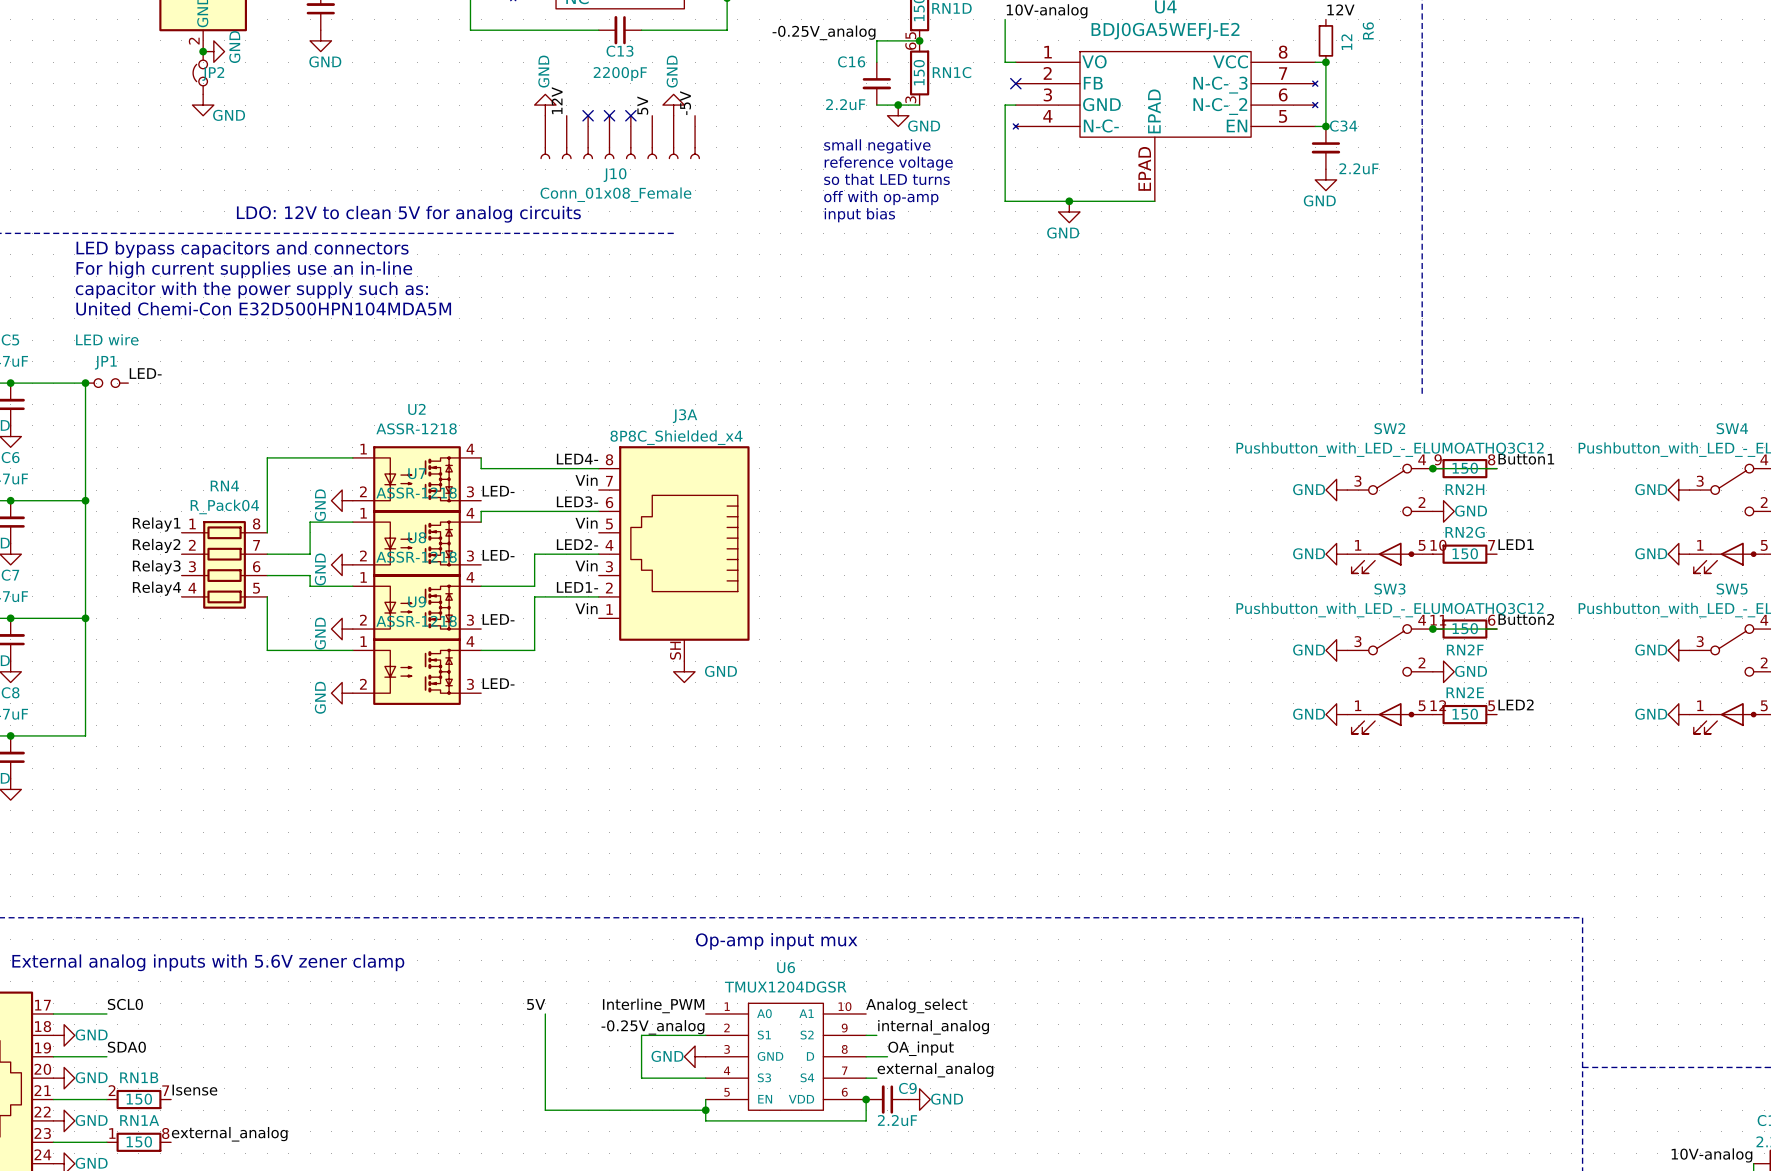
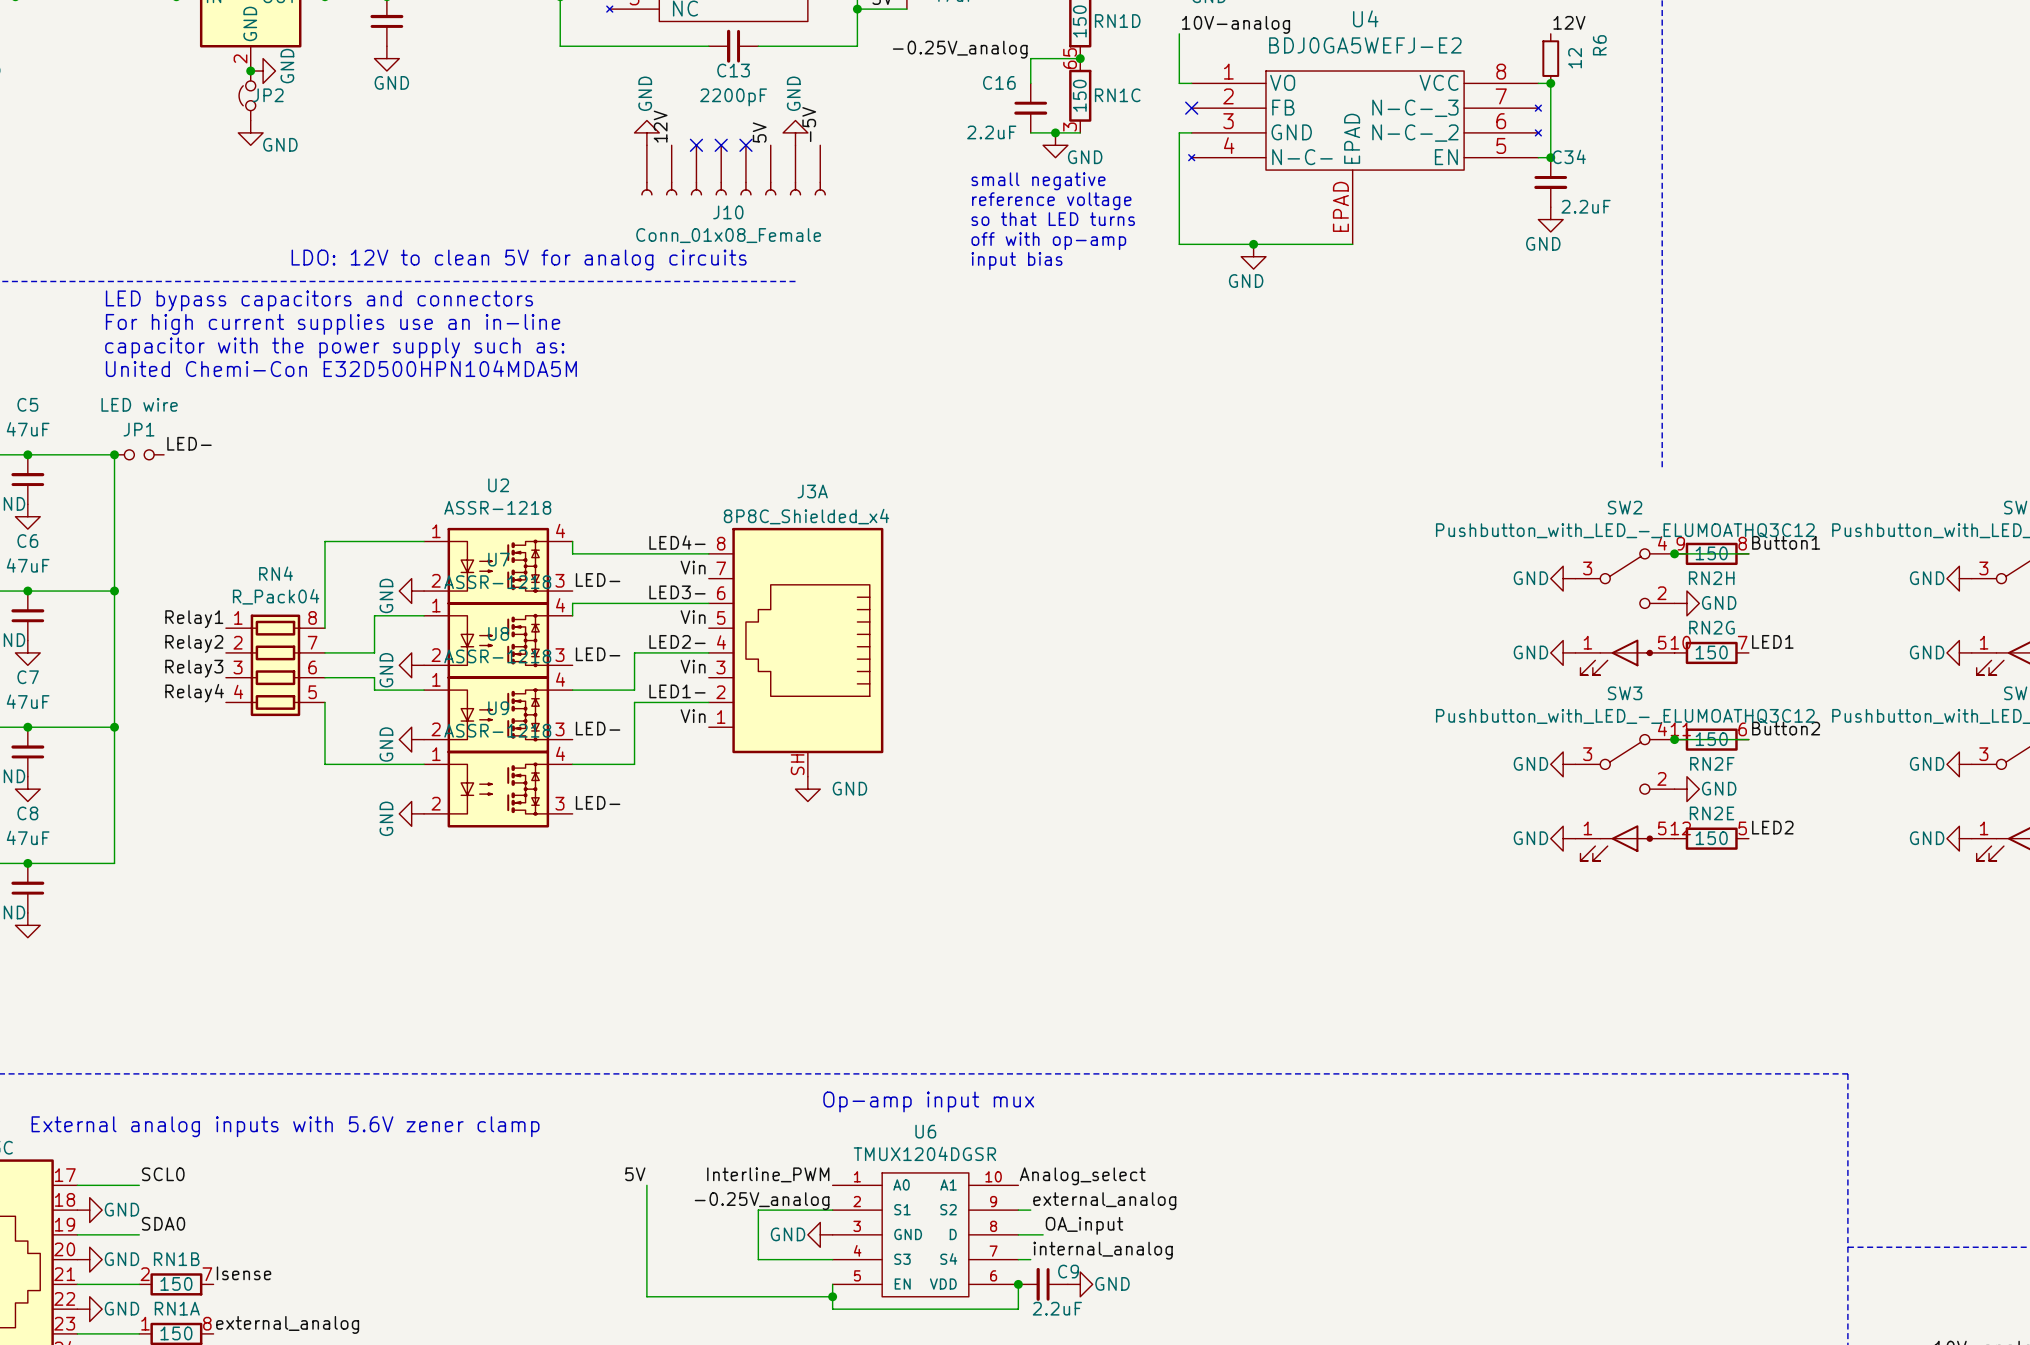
label: internal_analog (933, 1027) -> external_analog (1104, 1201)
label: external_analog (935, 1070) -> internal_analog (1103, 1250)

